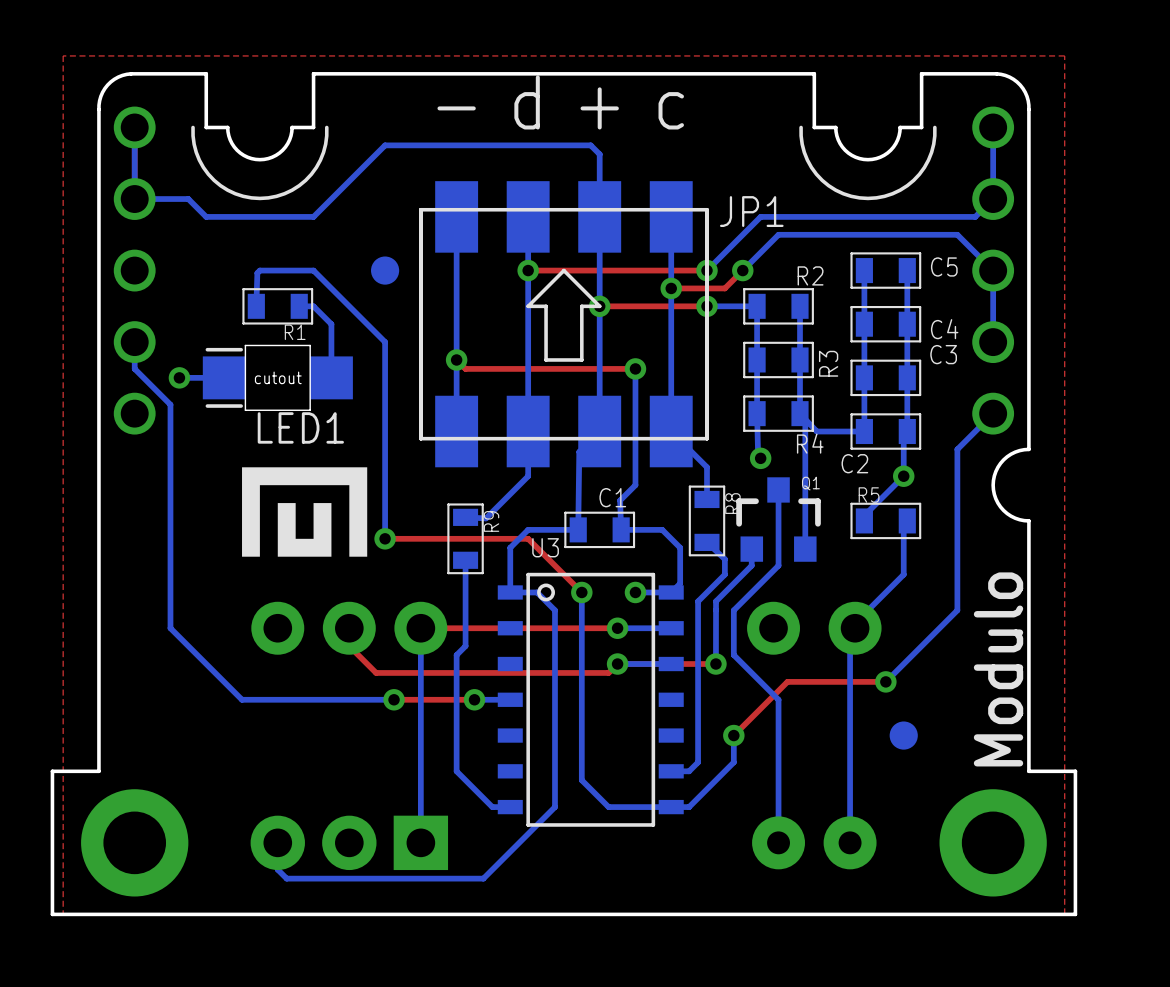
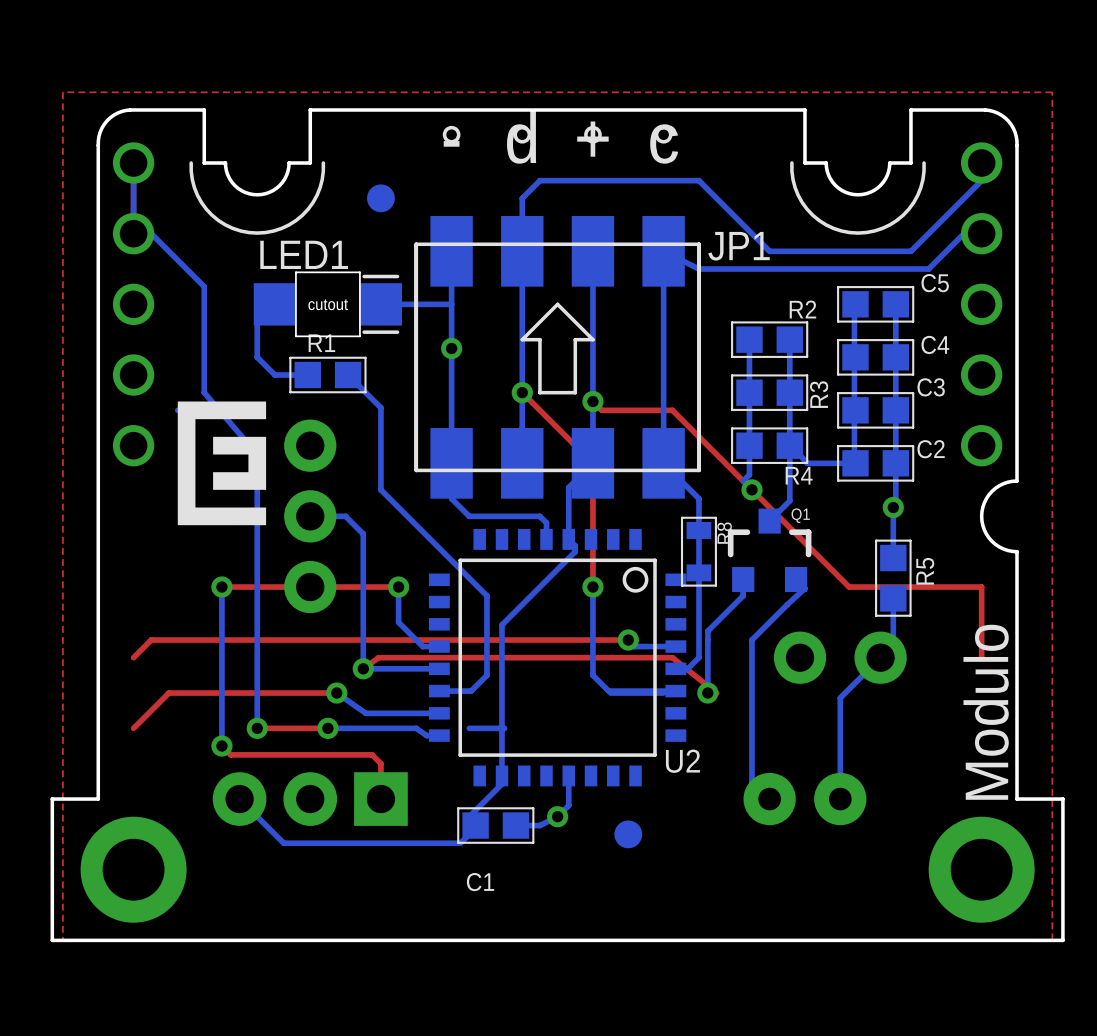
bottom track: (546, 145) (385, 145) (313, 216) (206, 216) (188, 199) (152, 199) -> (539, 180) (522, 198) (522, 251)
bottom track: (590, 145) (599, 154) (599, 216) -> none
bottom track: (993, 145) (993, 199) (975, 216) (921, 216) -> (981, 180) (910, 251)
JP1 footprint: [419, 181, 709, 468] -> [414, 125, 701, 499]
bottom track: none -> (151, 233) (204, 286) (204, 392) (257, 454) (257, 728)
bottom track: (778, 216) (760, 216) (707, 270) -> (769, 251) (698, 180) (584, 180)
bottom track: (778, 234) (742, 270) -> (769, 269) (698, 269) (663, 251)
bottom track: (939, 234) (957, 234) (993, 270) (993, 342) -> (928, 269) (963, 233) (981, 233)
C5 footprint: [850, 252, 922, 289] -> [837, 286, 915, 323]
C5 name position: C5 (944, 266) -> C5 (935, 283)
bottom track: none -> (274, 304) (257, 322) (257, 357) (274, 375) (307, 375)
part position: (385, 270) -> (380, 198)
bottom track: none -> (451, 304) (380, 304)
via: (528, 270) -> none
top track: (707, 270) (528, 270) -> (398, 587) (221, 587)
via: (707, 270) -> none
top track: (742, 270) (724, 288) (671, 288) -> none
via: (742, 270) -> none
bottom track: (907, 270) (907, 431) (903, 434) (903, 476) (865, 514) (864, 520) -> (895, 304) (895, 513) (893, 516) (893, 554)
R1 footprint: [242, 288, 314, 325] -> [289, 356, 367, 394]
via: (671, 288) -> none
R2 footprint: [743, 288, 814, 325] -> [731, 321, 809, 358]
C4 footprint: [850, 305, 922, 343] -> [837, 339, 915, 376]
bottom track: (256, 306) (257, 273) (259, 270) (313, 270) (385, 342) (385, 375) -> (348, 375) (380, 407)
bottom track: (299, 306) (313, 306) (331, 324) (331, 377) -> none
via: (599, 306) -> none
bottom track: (707, 306) (757, 306) (757, 413) (758, 455) (760, 458) -> none
top track: (707, 306) (599, 306) -> none
via: (707, 306) -> none
bottom track: none -> (749, 339) (749, 474) (743, 481)
bottom track: (800, 306) (800, 413) (805, 419) (805, 549) -> (789, 339) (789, 500) (769, 521)
via: none -> (451, 348)
C4 name position: C4 (944, 329) -> C4 (935, 344)
R1 name position: R1 (295, 332) -> R1 (321, 343)
R3 footprint: [743, 341, 814, 379] -> [731, 374, 809, 411]
bottom track: (134, 342) (134, 368) (170, 404) (170, 628) (242, 699) (331, 699) -> none
LED1 footprint: [202, 344, 353, 411] -> [253, 271, 403, 338]
top track: (456, 359) (465, 368) (635, 368) -> none
via: (456, 359) -> none
top track: none -> (522, 392) (592, 463) (592, 587)
via: none -> (522, 392)
C3 footprint: [850, 359, 922, 397] -> [837, 392, 915, 429]
drawing: none -> [177, 401, 267, 526]
top track: none -> (592, 401) (601, 410) (672, 410) (849, 587) (981, 587) (981, 657)
via: none -> (592, 401)
bottom track: (635, 368) (635, 485) (620, 500) (621, 529) (662, 529) (680, 547) (680, 583) (671, 592) (635, 592) -> none
via: (635, 368) -> none
via: (179, 377) -> none
R4 footprint: [743, 395, 814, 432] -> [731, 427, 809, 464]
C2 footprint: [850, 413, 922, 450] -> [837, 445, 915, 482]
bottom track: (993, 413) (957, 449) (957, 610) (885, 681) -> none
LED1 name position: LED1 (300, 427) -> LED1 (304, 254)
bottom track: none -> (451, 463) (451, 498) (469, 516) (539, 516) (546, 522) (546, 539)
bottom track: (528, 431) (528, 476) (485, 518) (465, 517) -> none
bottom track: (579, 451) (578, 529) (528, 529) (510, 547) (510, 592) (537, 592) (554, 610) (554, 807) (483, 878) (286, 878) (277, 869) (277, 842) -> (572, 483) (568, 487) (568, 539) (575, 545) (575, 551) (501, 625) (501, 784) (469, 816) (469, 831) (475, 825) (460, 843) (283, 843) (239, 799)
bottom track: (385, 458) (385, 538) -> (380, 489) (486, 595) (486, 675) (471, 691) (432, 691)
C2 name position: C2 (854, 463) -> C2 (931, 449)
drawing: [242, 467, 368, 557] -> none
bottom track: none -> (310, 516) (345, 516) (363, 534) (363, 668) (439, 668)
bottom track: (778, 489) (778, 565) (733, 610) (733, 655) (778, 699) (778, 842) -> none
C1 name position: C1 (612, 497) -> C1 (480, 882)
bottom track: none -> (698, 530) (698, 657) (687, 668) (675, 668)
R5 footprint: [850, 502, 922, 540] -> [875, 539, 912, 617]
C1 footprint: [564, 511, 636, 549] -> [457, 807, 535, 844]
bottom track: (903, 527) (903, 568) -> none
top track: (385, 538) (528, 538) (581, 592) -> none
via position: (385, 538) -> (398, 587)
R9: (465, 538) -> none
bottom track: (707, 542) (724, 559) (724, 574) (698, 601) (698, 762) (689, 771) (671, 771) -> none
bottom track: none -> (796, 579) (804, 588) (751, 640) (751, 781) (769, 799)
bottom track: none -> (221, 587) (221, 746)
via: none -> (221, 587)
bottom track: none -> (398, 587) (398, 622) (422, 646) (439, 646)
bottom track: none -> (592, 587) (592, 675) (608, 691) (675, 691)
via: none -> (592, 587)
bottom track: (465, 560) (465, 646) (456, 655) (456, 771) (492, 807) (510, 807) -> none
bottom track: (903, 574) (864, 614) (855, 628) (850, 642) (850, 669) -> (893, 604) (893, 640) (880, 657) (840, 697)
bottom track: (581, 592) (581, 780) (608, 807) (689, 807) (733, 762) (733, 735) -> none
via: (581, 592) -> none
via: (635, 592) -> none
bottom track: none -> (628, 640) (634, 646) (675, 646)
top track: none -> (628, 640) (151, 640) (133, 657)
via: none -> (628, 640)
top track: (349, 628) (349, 646) (376, 672) (608, 672) (617, 664) (715, 664) -> none
part rotation: 0° (349, 628) -> 90° clockwise (310, 516)
part position: (349, 628) -> (310, 516)
bottom track: (420, 628) (420, 842) -> none
top track: none -> (416, 657) (378, 657) (363, 668)
U2: none -> (557, 657)
top track: none -> (610, 657) (672, 657) (716, 693)
via: (617, 628) -> none
bottom track: (671, 628) (617, 628) -> none
part position: (814, 628) -> (840, 657)
via: none -> (363, 668)
bottom track: none -> (336, 693) (365, 713) (439, 713)
top track: none -> (336, 693) (168, 693) (133, 728)
via: none -> (336, 693)
via: (617, 664) -> none
top track: (885, 681) (787, 681) (733, 735) -> none
via: (885, 681) -> none
via: none -> (257, 728)
top track: none -> (327, 728) (257, 728)
via: none -> (327, 728)
bottom track: none -> (389, 728) (416, 728) (426, 735) (439, 735)
via: (394, 699) -> none
top track: (474, 699) (394, 699) -> none
via: (474, 699) -> none
U3: (590, 699) -> none
top track: none -> (221, 746) (230, 754) (372, 754) (380, 763) (380, 799)
via: none -> (221, 746)
via: (733, 735) -> none
part position: (903, 735) -> (628, 834)
bottom track: none -> (568, 775) (568, 805) (557, 816) (539, 825) (515, 825)
bottom track: (850, 771) (850, 842) -> none
via: none -> (557, 816)
part position: (349, 842) -> (310, 799)
part position: (814, 842) -> (804, 799)

